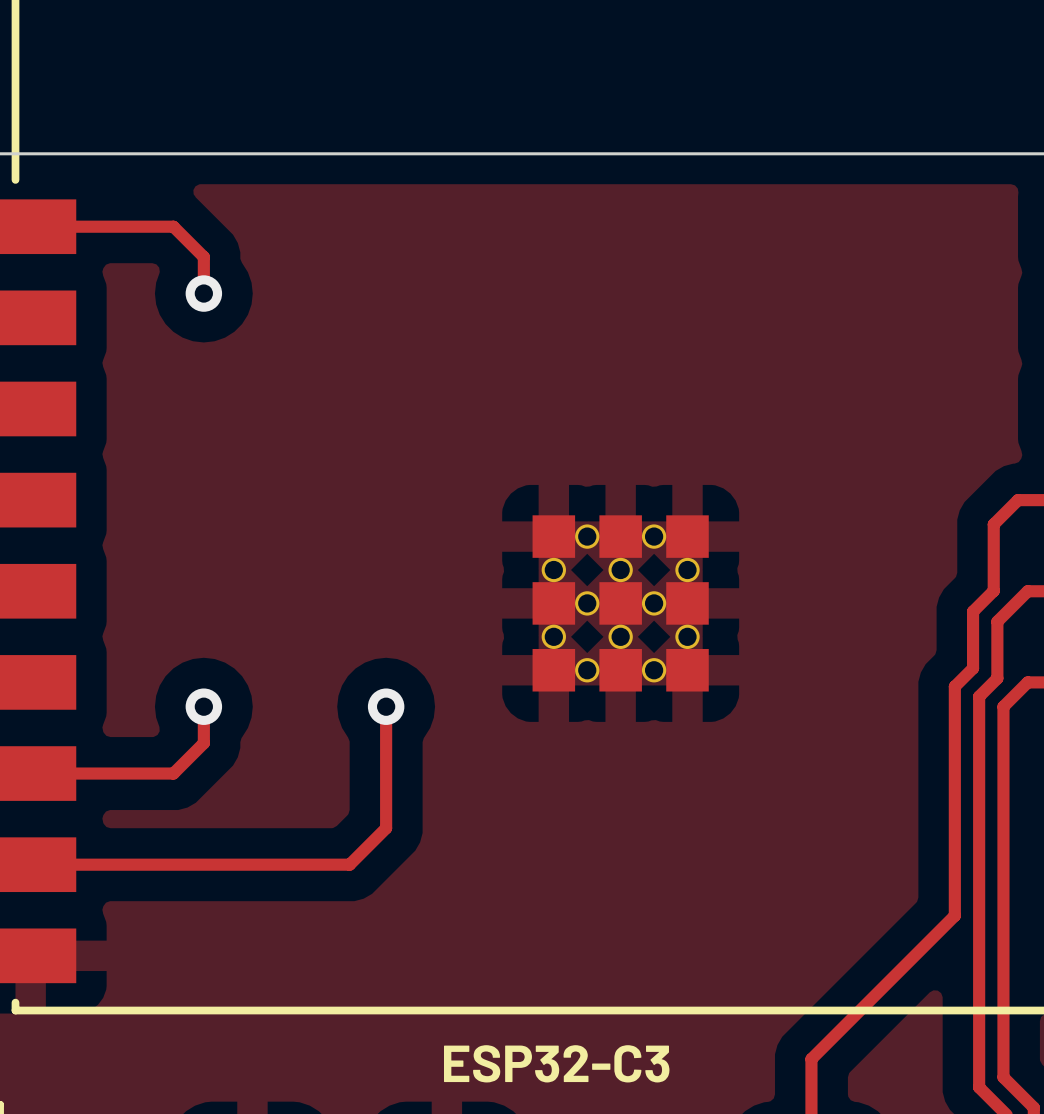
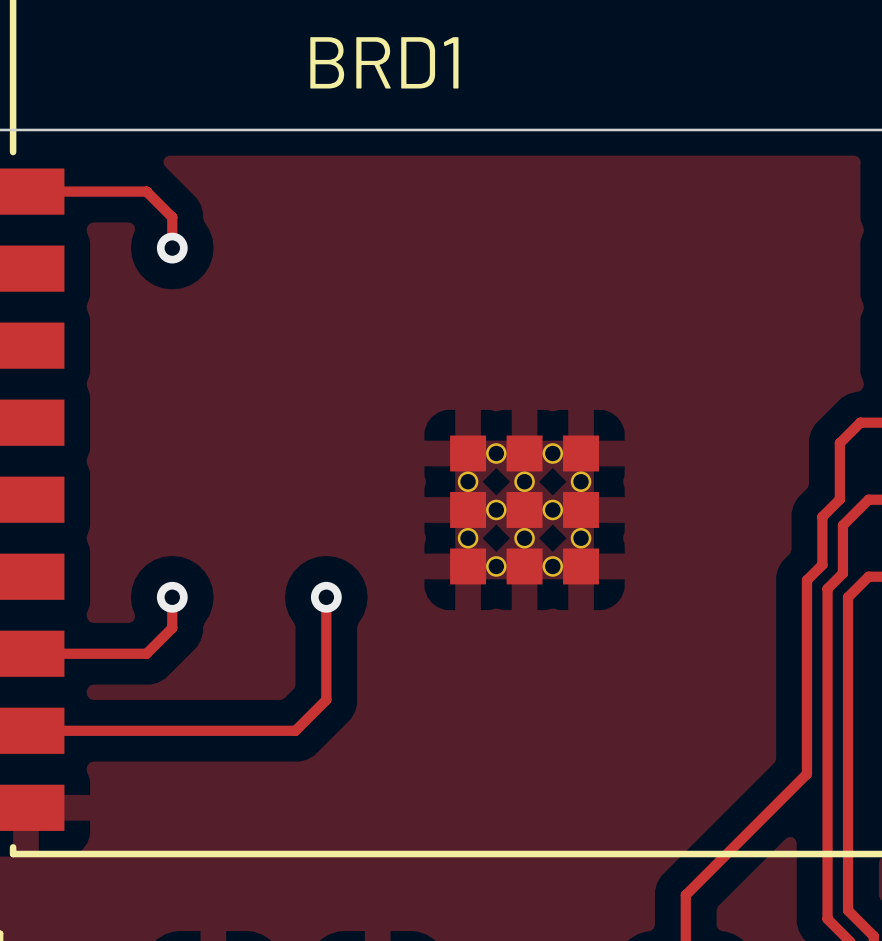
ESP32-C3 name: ESP32-C3 (556, 1063) -> BRD1 (384, 62)

